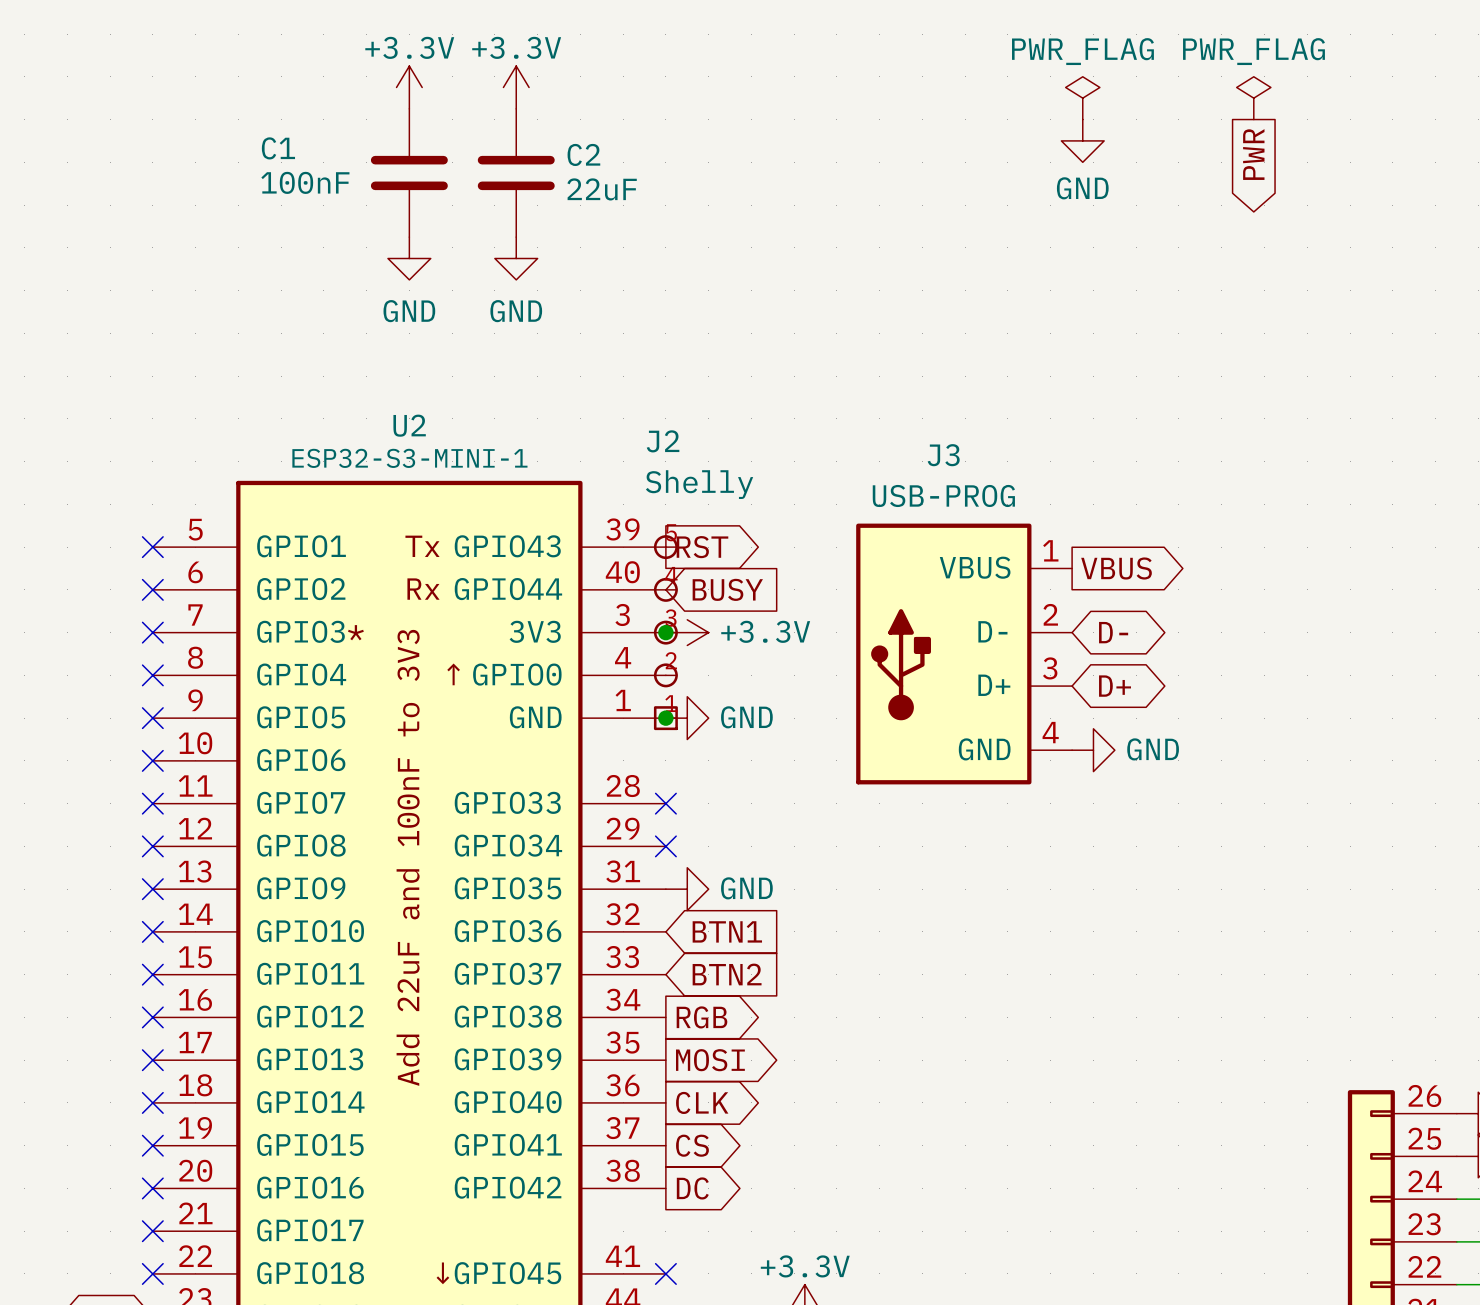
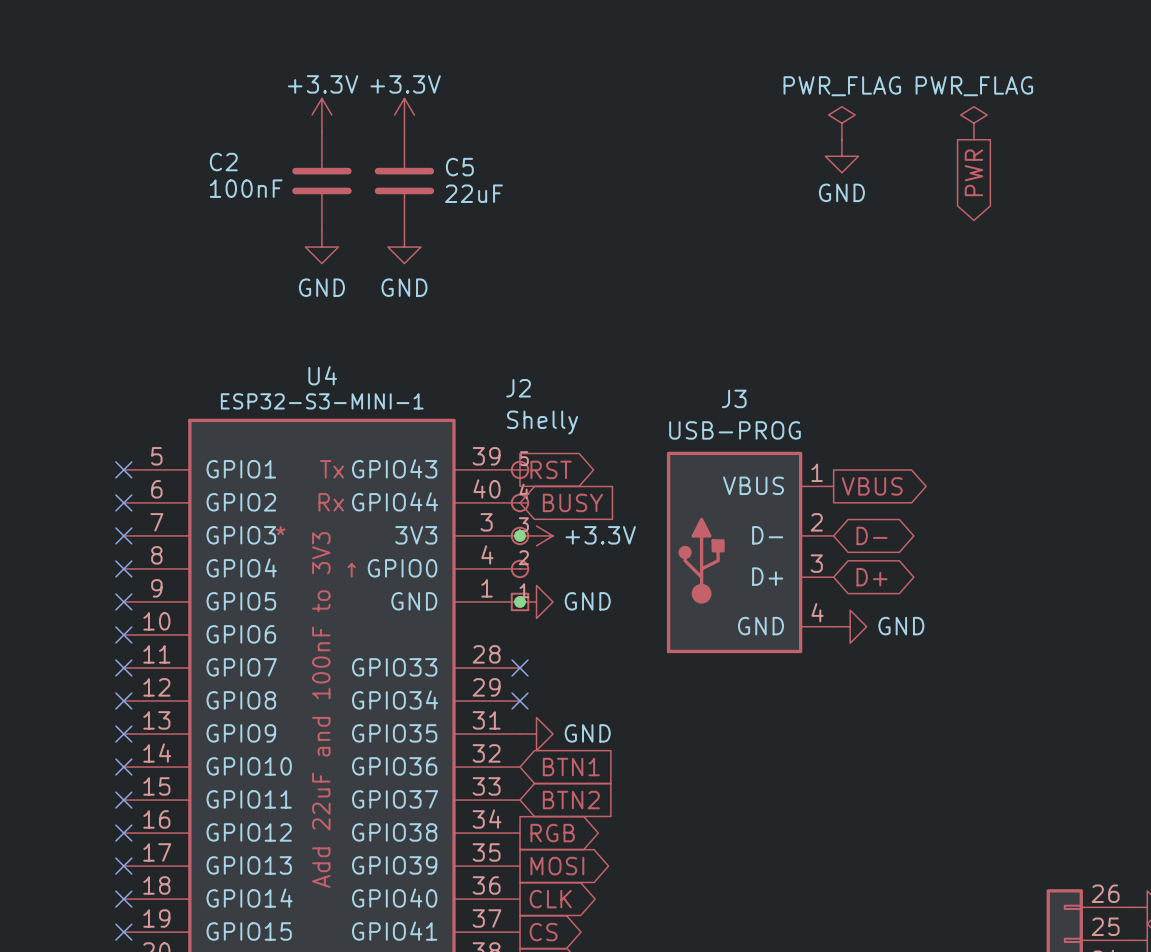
C1 name: C1 (278, 148) -> C2 (223, 162)
C2 name: C2 (583, 154) -> C5 (459, 167)
U2 name: U2 (409, 425) -> U4 (322, 375)

